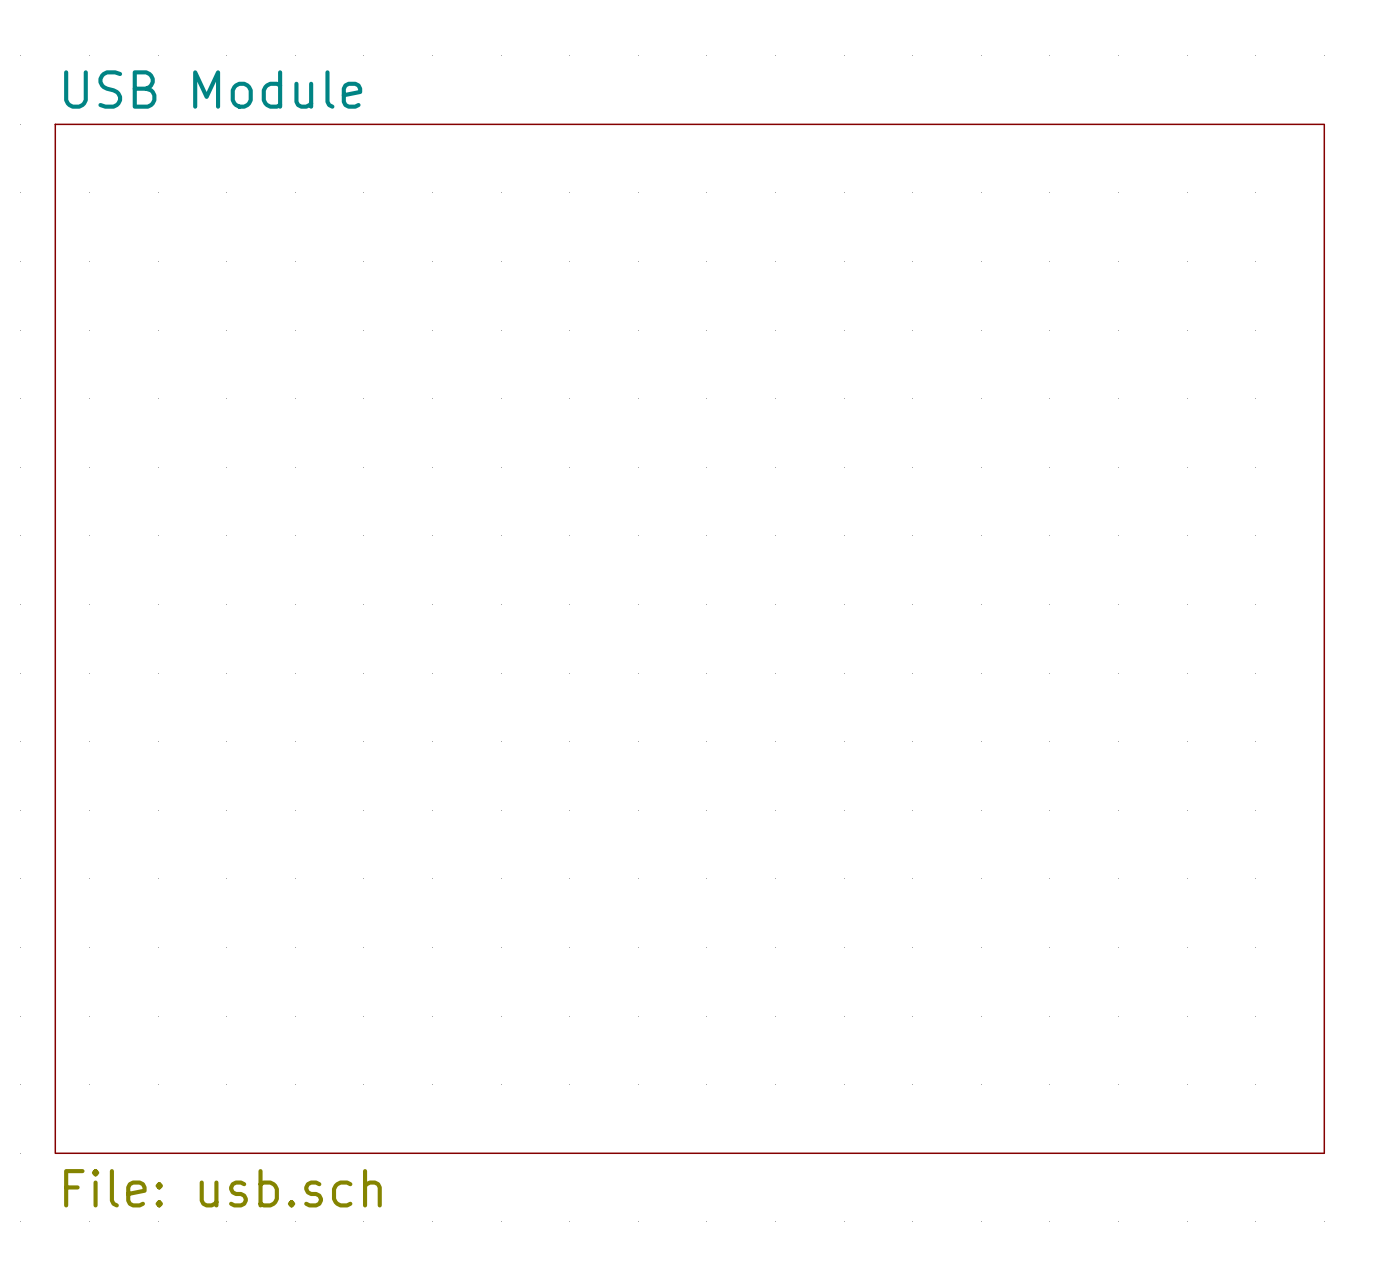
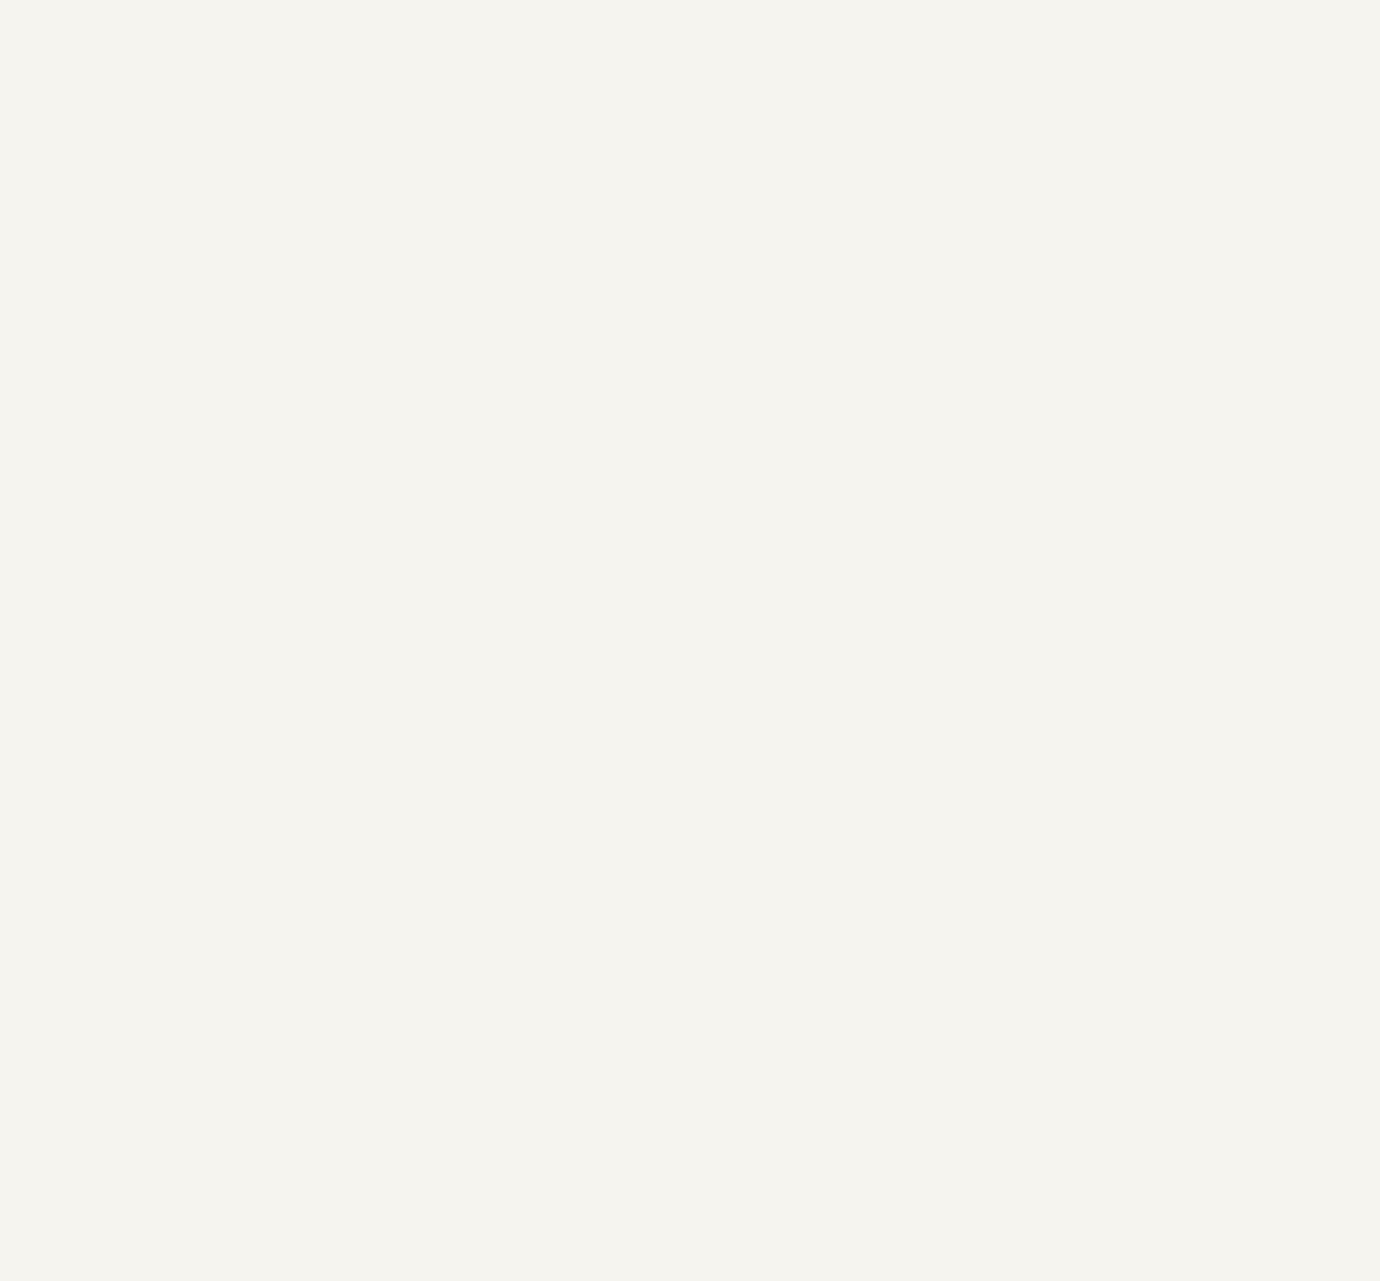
sheet USB Module: File: usb.sch (689, 638) -> none

